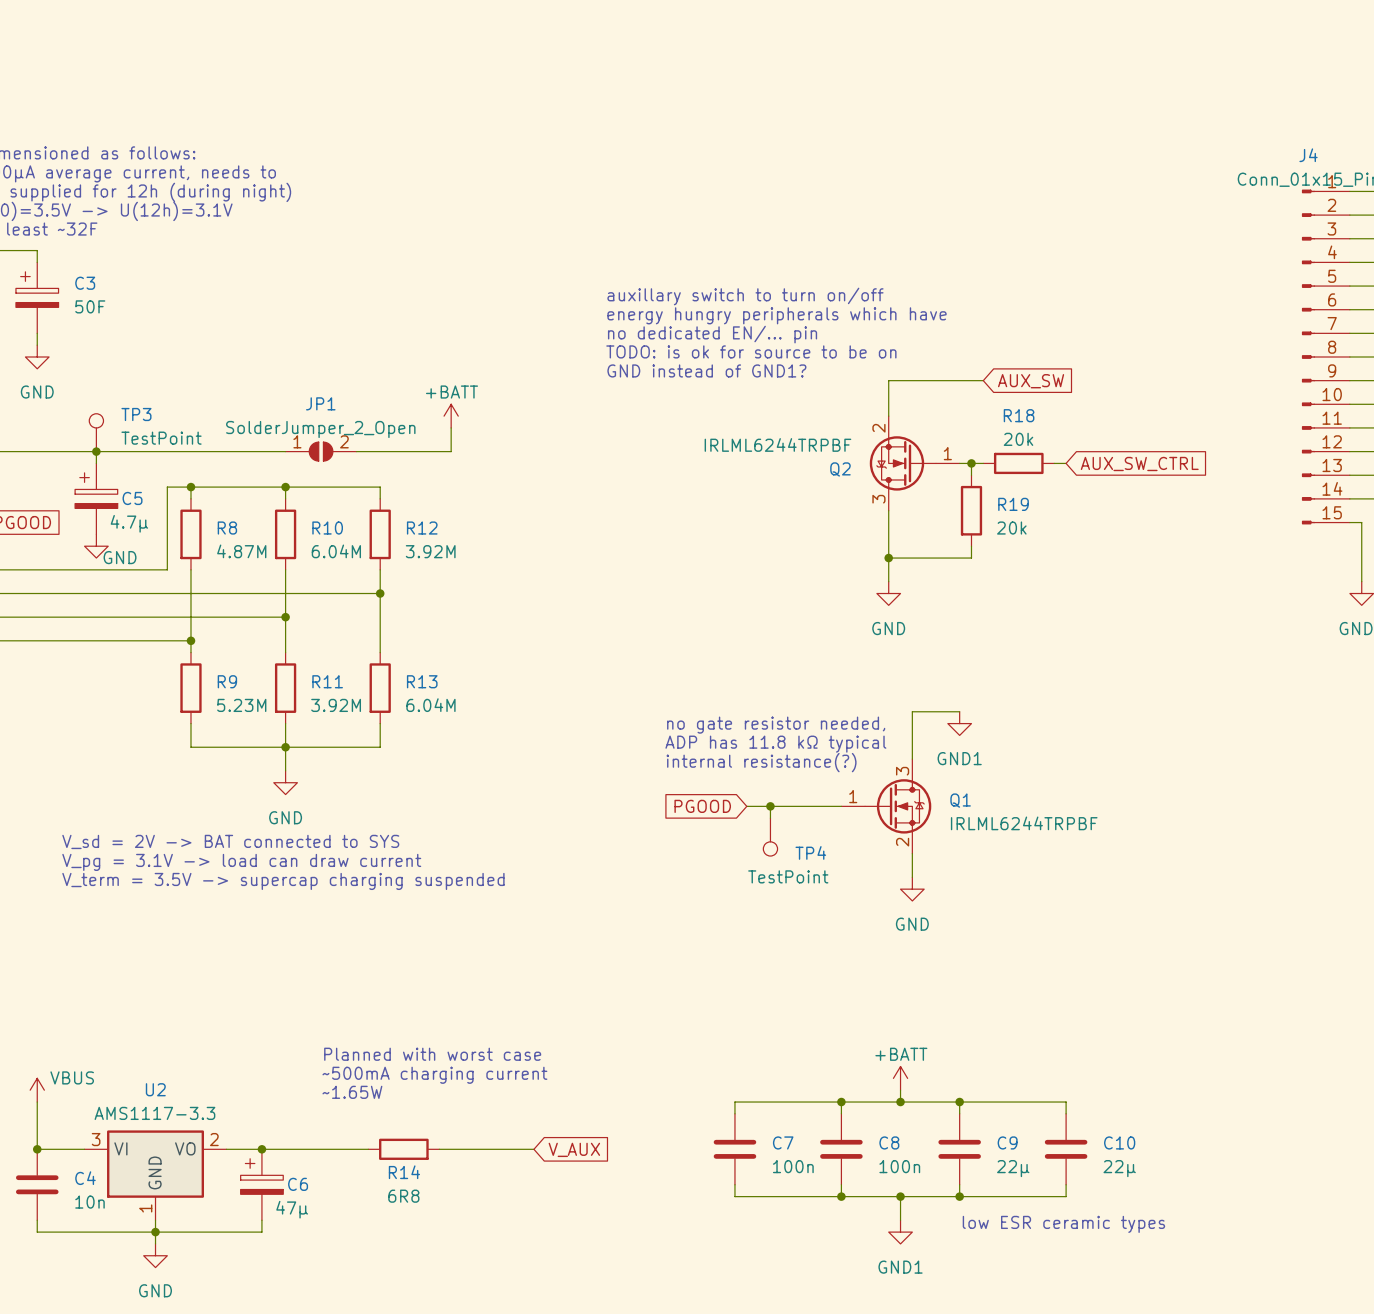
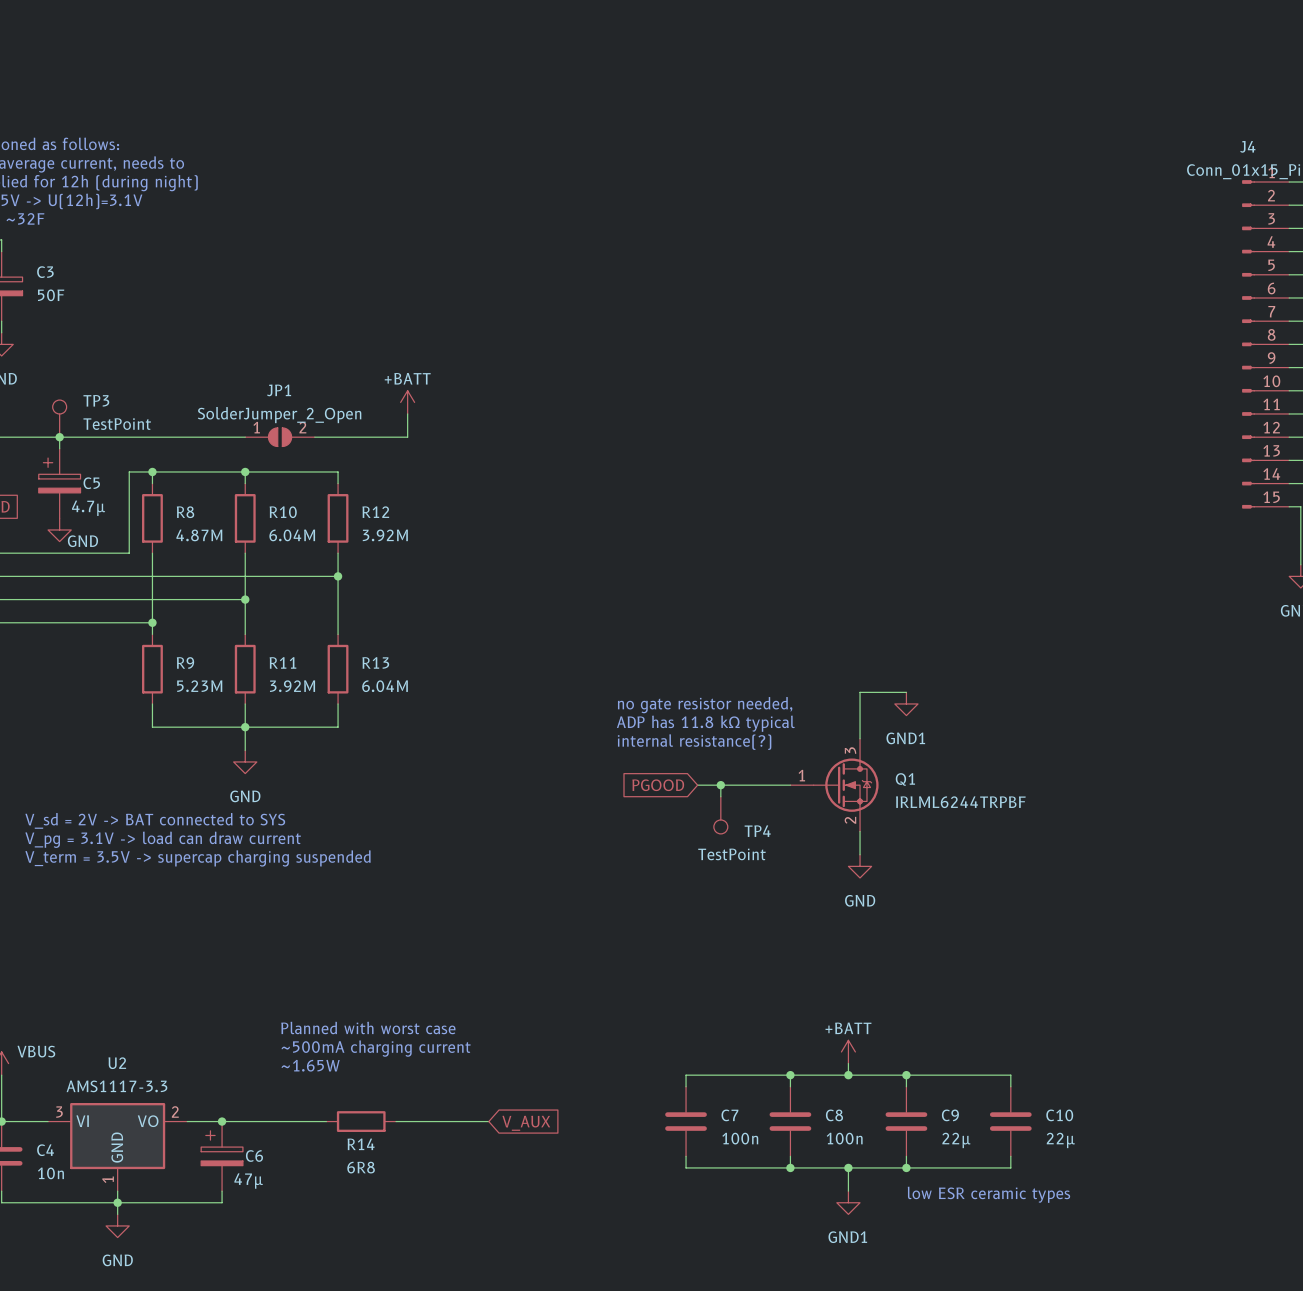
text: auxillary switch to turn on/off (745, 296) -> none
text: energy hungry peripherals which have (777, 315) -> none
text: no dedicated EN/... pin (712, 334) -> none
text: TODO: is ok for source to be on (751, 351) -> none
text: GND instead of GND1? (706, 370) -> none
wire: (983, 380) (888, 380) (888, 416) -> none
global label: AUX_SW (1031, 381) -> none
Q2: IRLML6244TRPBF (914, 463) -> none
wire: (959, 463) (983, 463) -> none
wire: (971, 463) (971, 475) -> none
junction: (971, 463) -> none
R18: 20k (1018, 463) -> none
wire: (1054, 463) (1066, 463) -> none
global label: AUX_SW_CTRL (1139, 463) -> none
wire: (888, 510) (888, 581) -> none
R19: 20k (971, 510) -> none
wire: (971, 546) (971, 558) (888, 558) -> none
junction: (888, 558) -> none
power symbol: GND (888, 593) -> none

